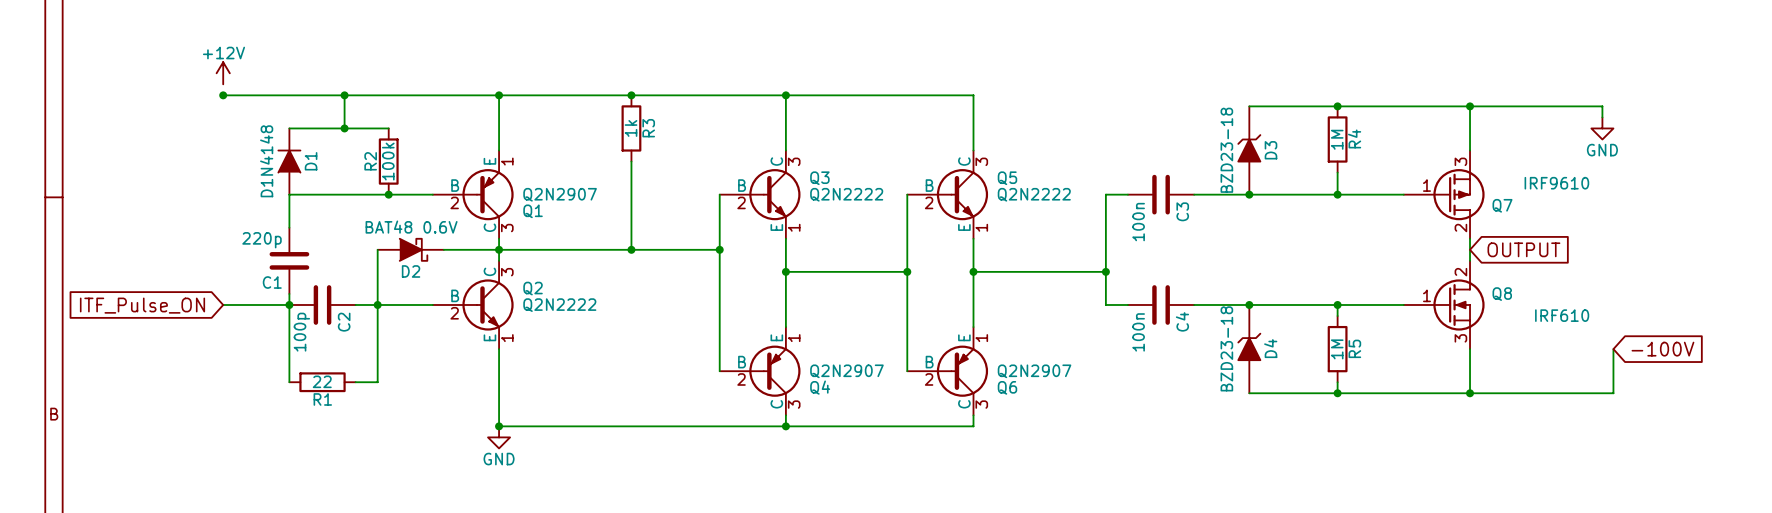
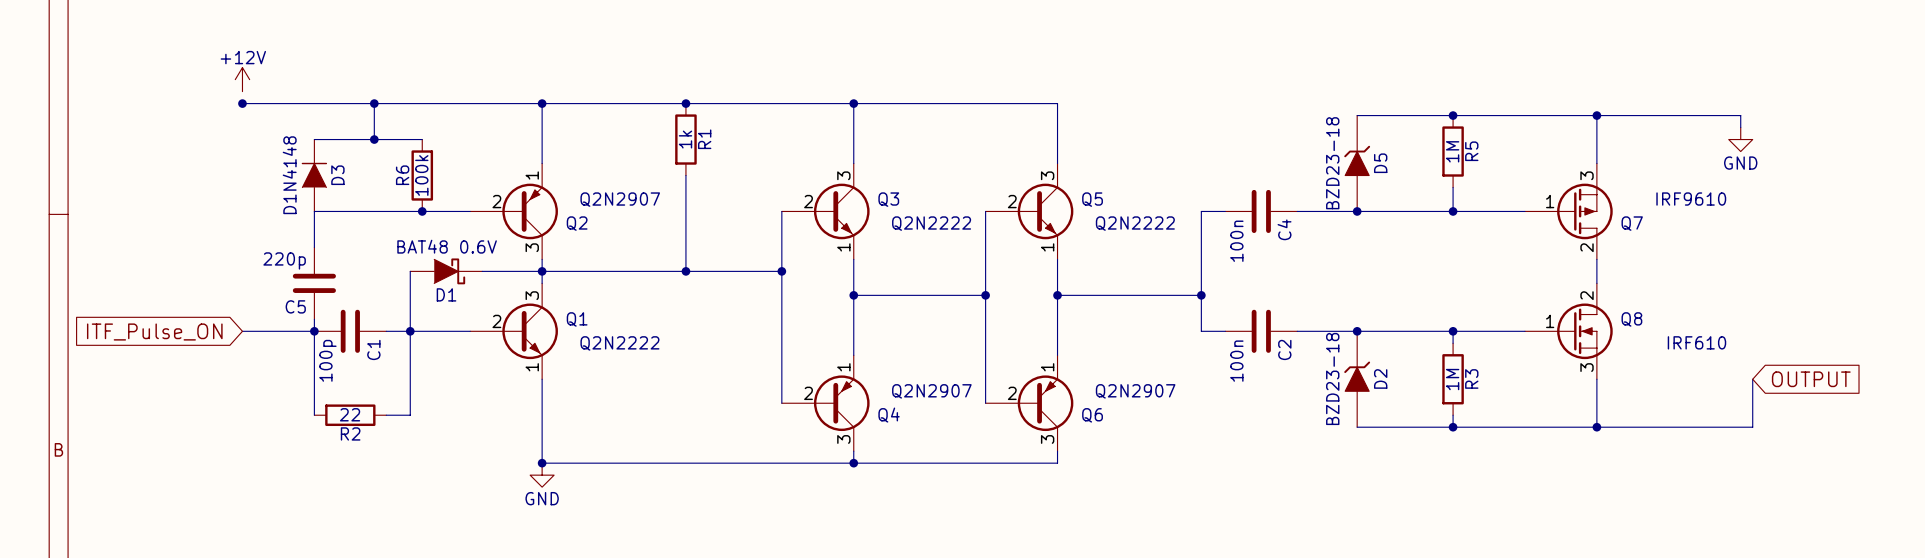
R3 name: R3 (648, 128) -> R1 (704, 139)
R4 name: R4 (1354, 138) -> R5 (1471, 151)
Q1 symbol: [432, 150, 514, 239] -> [470, 283, 558, 380]
Q3 symbol: [719, 150, 801, 239] -> [781, 163, 870, 260]
Q5 symbol: [907, 150, 989, 239] -> [985, 163, 1074, 260]
D3 name: D3 (1270, 150) -> D5 (1380, 163)
D1 name: D1 (311, 161) -> D3 (337, 175)
R2 name: R2 (370, 161) -> R6 (402, 175)
Q1 value: Q2N2907 (560, 194) -> Q2N2222 (619, 343)
Q1 name position: Q1 (533, 211) -> Q1 (577, 319)
C3 name: C3 (1182, 211) -> C4 (1284, 229)
global label: OUTPUT (1523, 249) -> none
Q2 symbol: [432, 260, 514, 350] -> [470, 163, 558, 260]
D2 name: D2 (411, 271) -> D1 (446, 294)
C1 name: C1 (272, 282) -> C5 (295, 306)
Q2 name position: Q2 (533, 288) -> Q2 (577, 223)
Q2 value: Q2N2222 (559, 305) -> Q2N2907 (620, 199)
C4 name: C4 (1182, 321) -> C2 (1284, 349)
C2 name: C2 (344, 322) -> C1 (373, 349)
Q4 symbol: [719, 327, 801, 416] -> [781, 355, 870, 452]
Q6 symbol: [907, 327, 989, 416] -> [985, 355, 1074, 452]
D4 name: D4 (1270, 348) -> D2 (1380, 378)
R5 name: R5 (1354, 348) -> R3 (1471, 378)
global label: -100V (1662, 349) -> OUTPUT (1811, 379)
R1 name: R1 (322, 399) -> R2 (350, 433)

